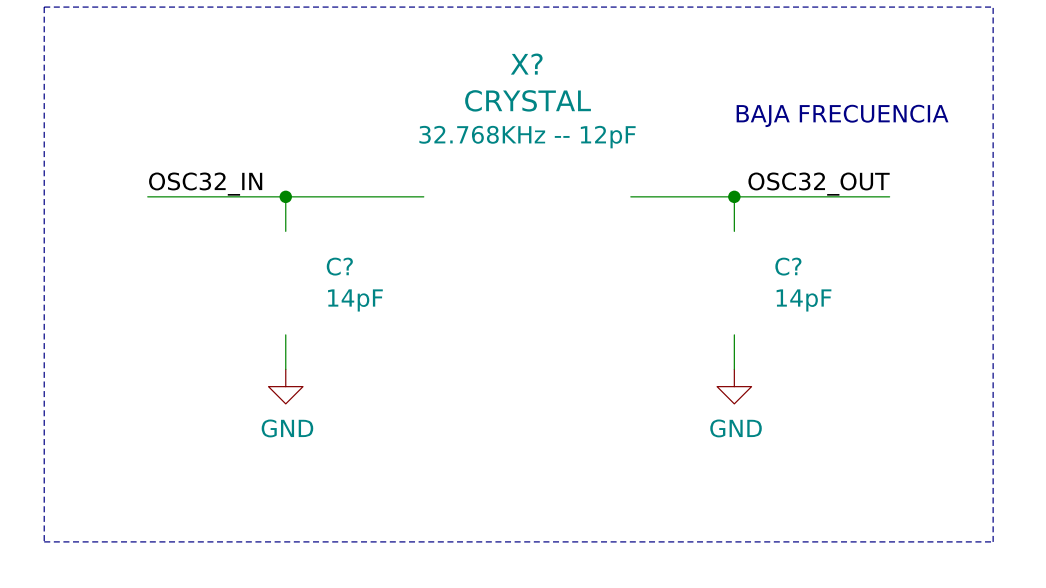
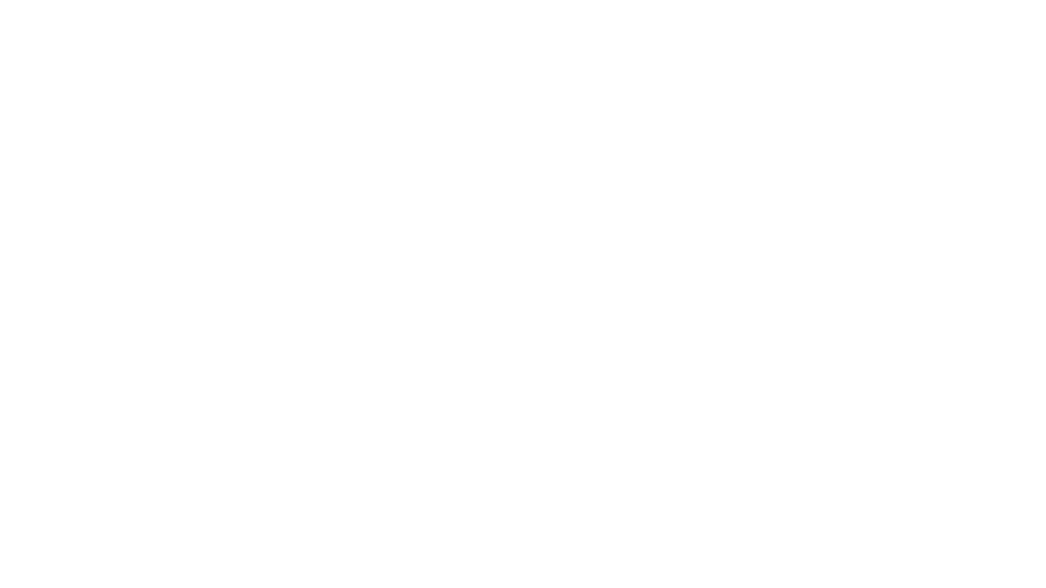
line: (44, 7) (44, 541) (993, 541) (993, 7) (44, 7) -> none
X?: CRYSTAL (527, 100) -> none
text: BAJA FRECUENCIA (842, 115) -> none
label: OSC32_IN (205, 184) -> none
label: OSC32_OUT (819, 184) -> none
wire: (147, 196) (423, 196) -> none
wire: (285, 196) (285, 231) -> none
junction: (285, 196) -> none
wire: (630, 196) (889, 196) -> none
wire: (734, 196) (734, 231) -> none
junction: (734, 196) -> none
C?: 14pF (354, 284) -> none
C?: 14pF (803, 284) -> none
wire: (285, 334) (285, 369) -> none
wire: (734, 334) (734, 369) -> none
power symbol: GND (285, 386) -> none
power symbol: GND (734, 386) -> none

